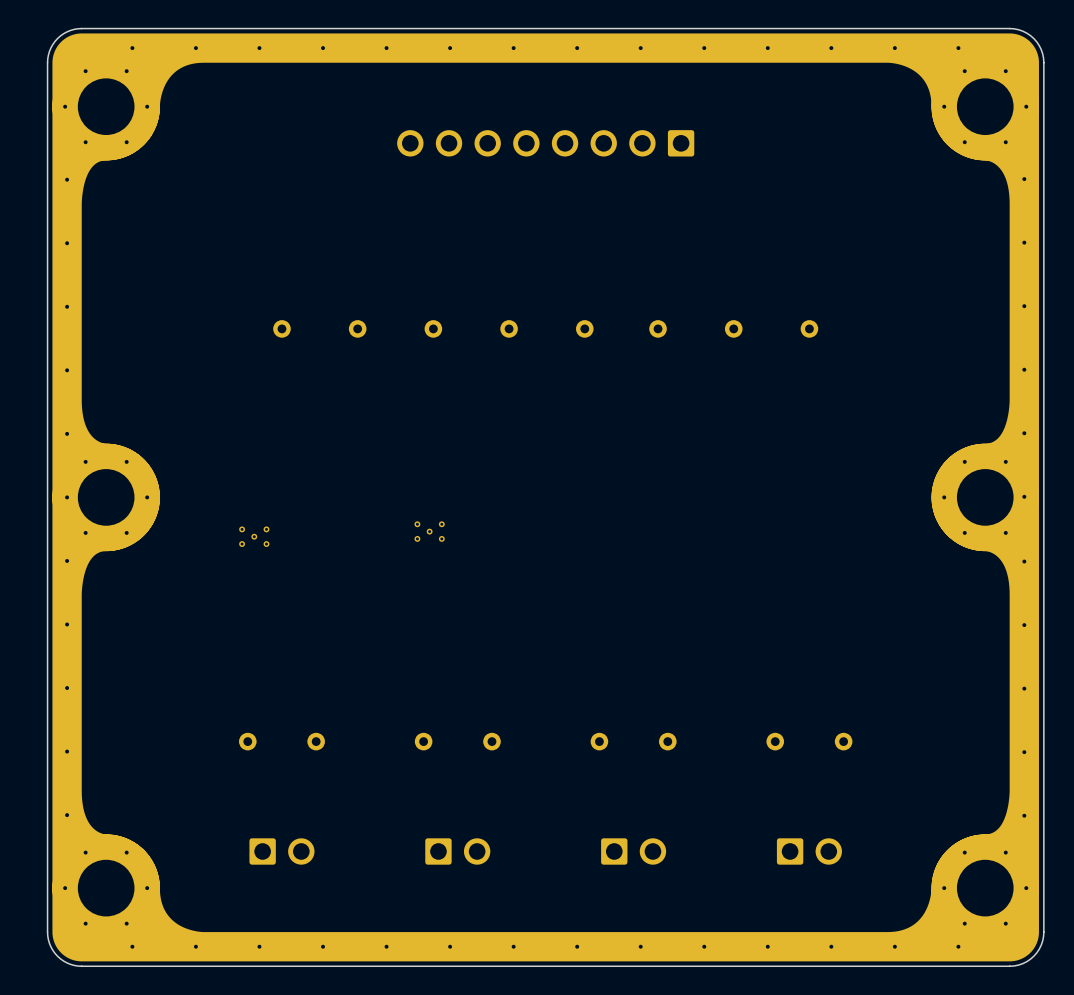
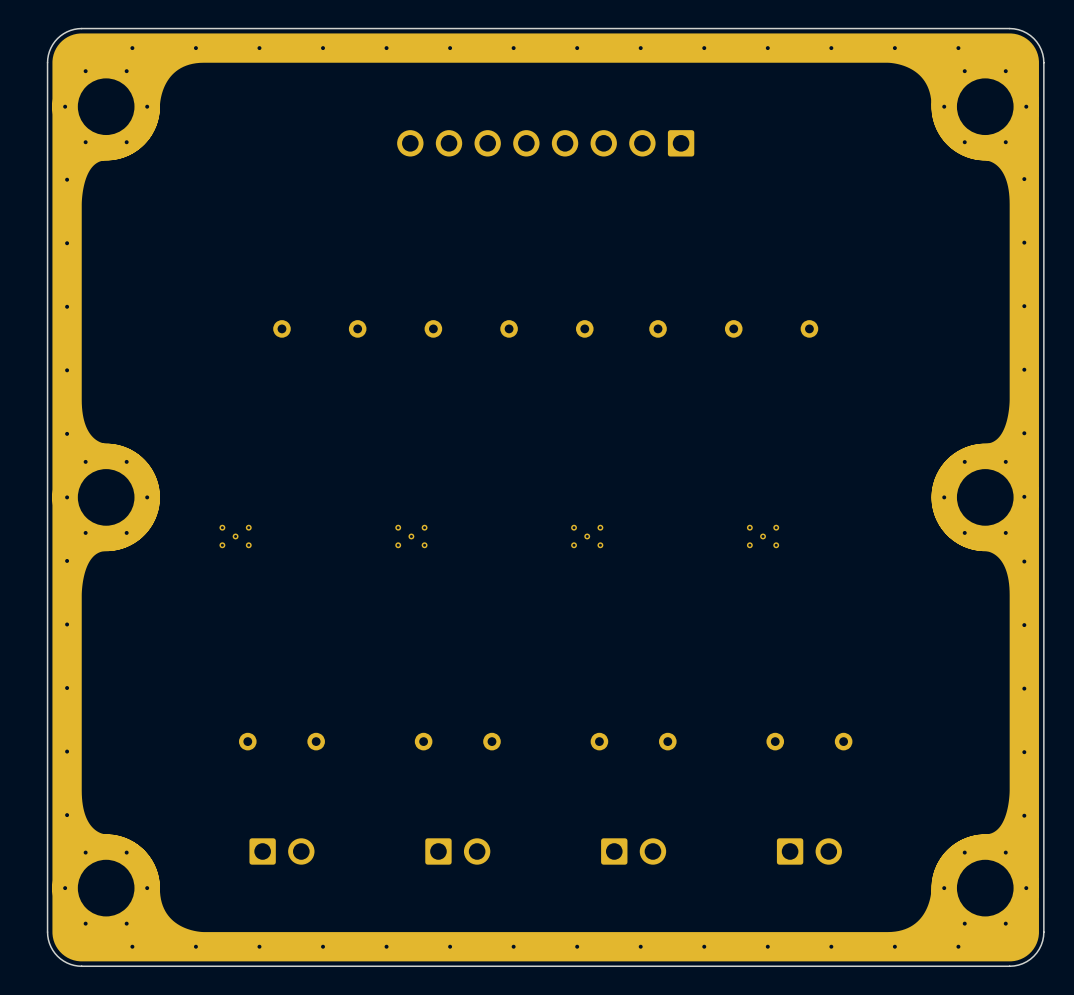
part: (429, 531) -> none
part: none -> (235, 536)
part: (254, 536) -> none
part: none -> (411, 536)
part: none -> (587, 536)
part: none -> (763, 536)

